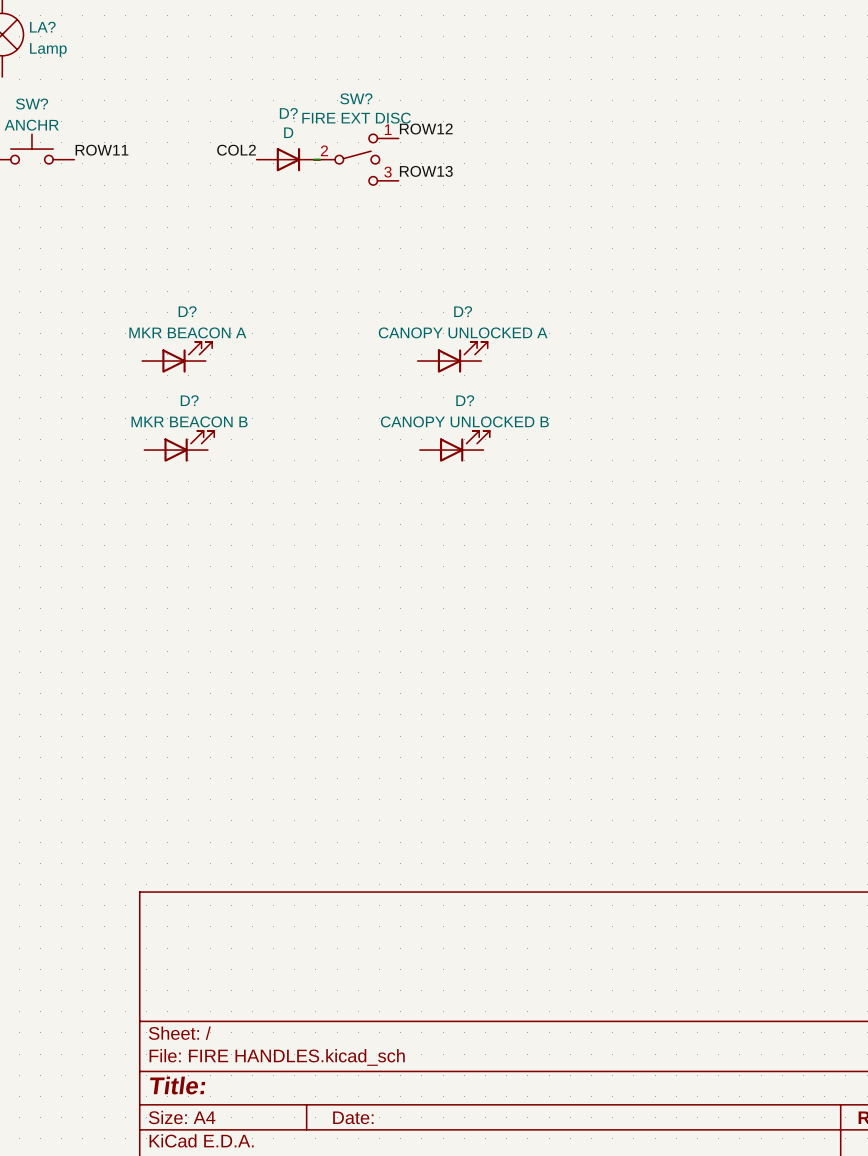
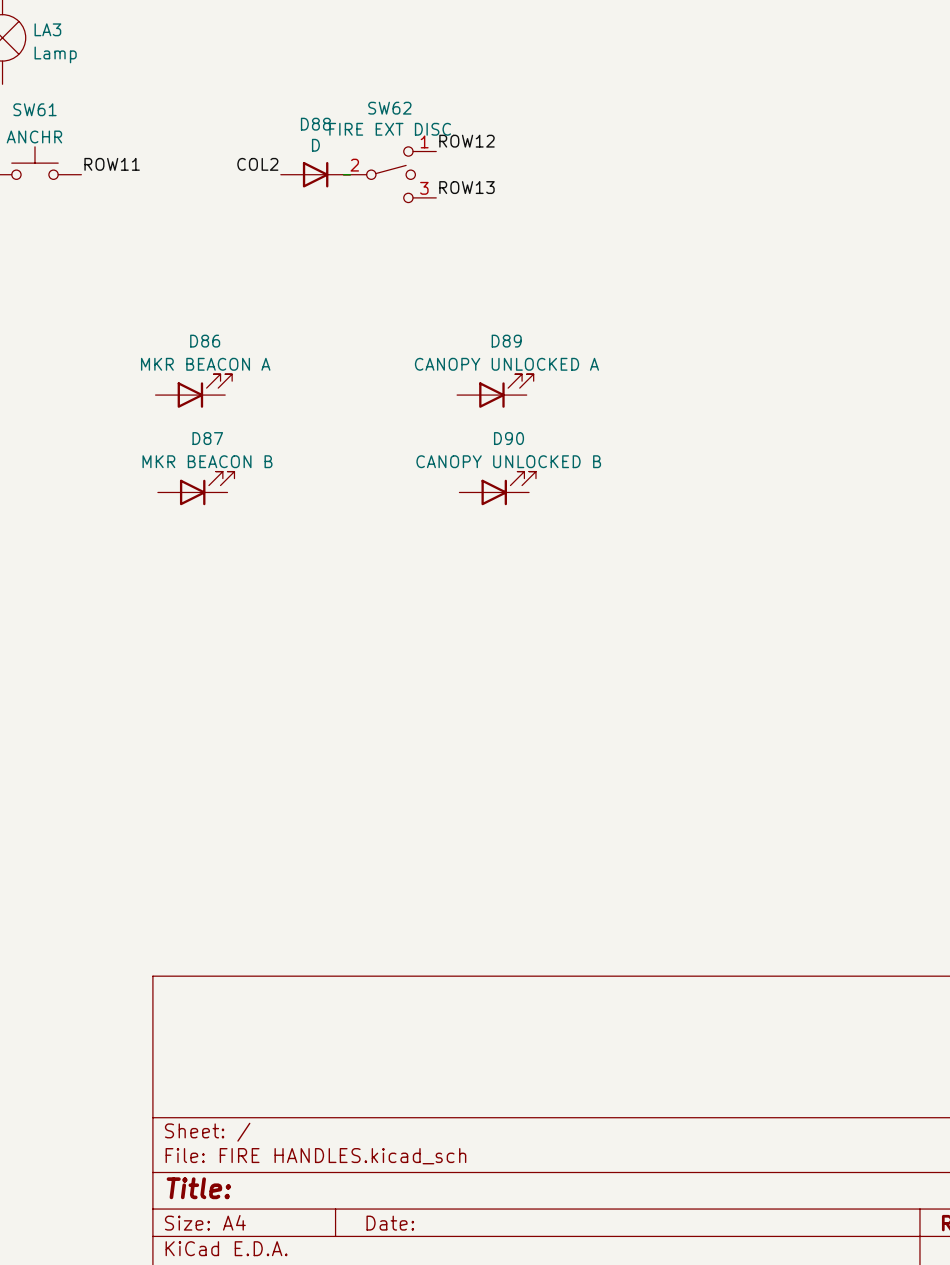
LA? name: LA? (42, 27) -> LA3 (47, 29)
SW? name: SW? (356, 98) -> SW62 (389, 108)
SW? name: SW? (32, 104) -> SW61 (34, 109)
D? name: D? (288, 113) -> D88 (315, 124)
D? name: D? (187, 311) -> D86 (205, 341)
D? name: D? (463, 311) -> D89 (506, 341)
D? name: D? (189, 400) -> D87 (207, 438)
D? name: D? (465, 400) -> D90 (509, 438)

